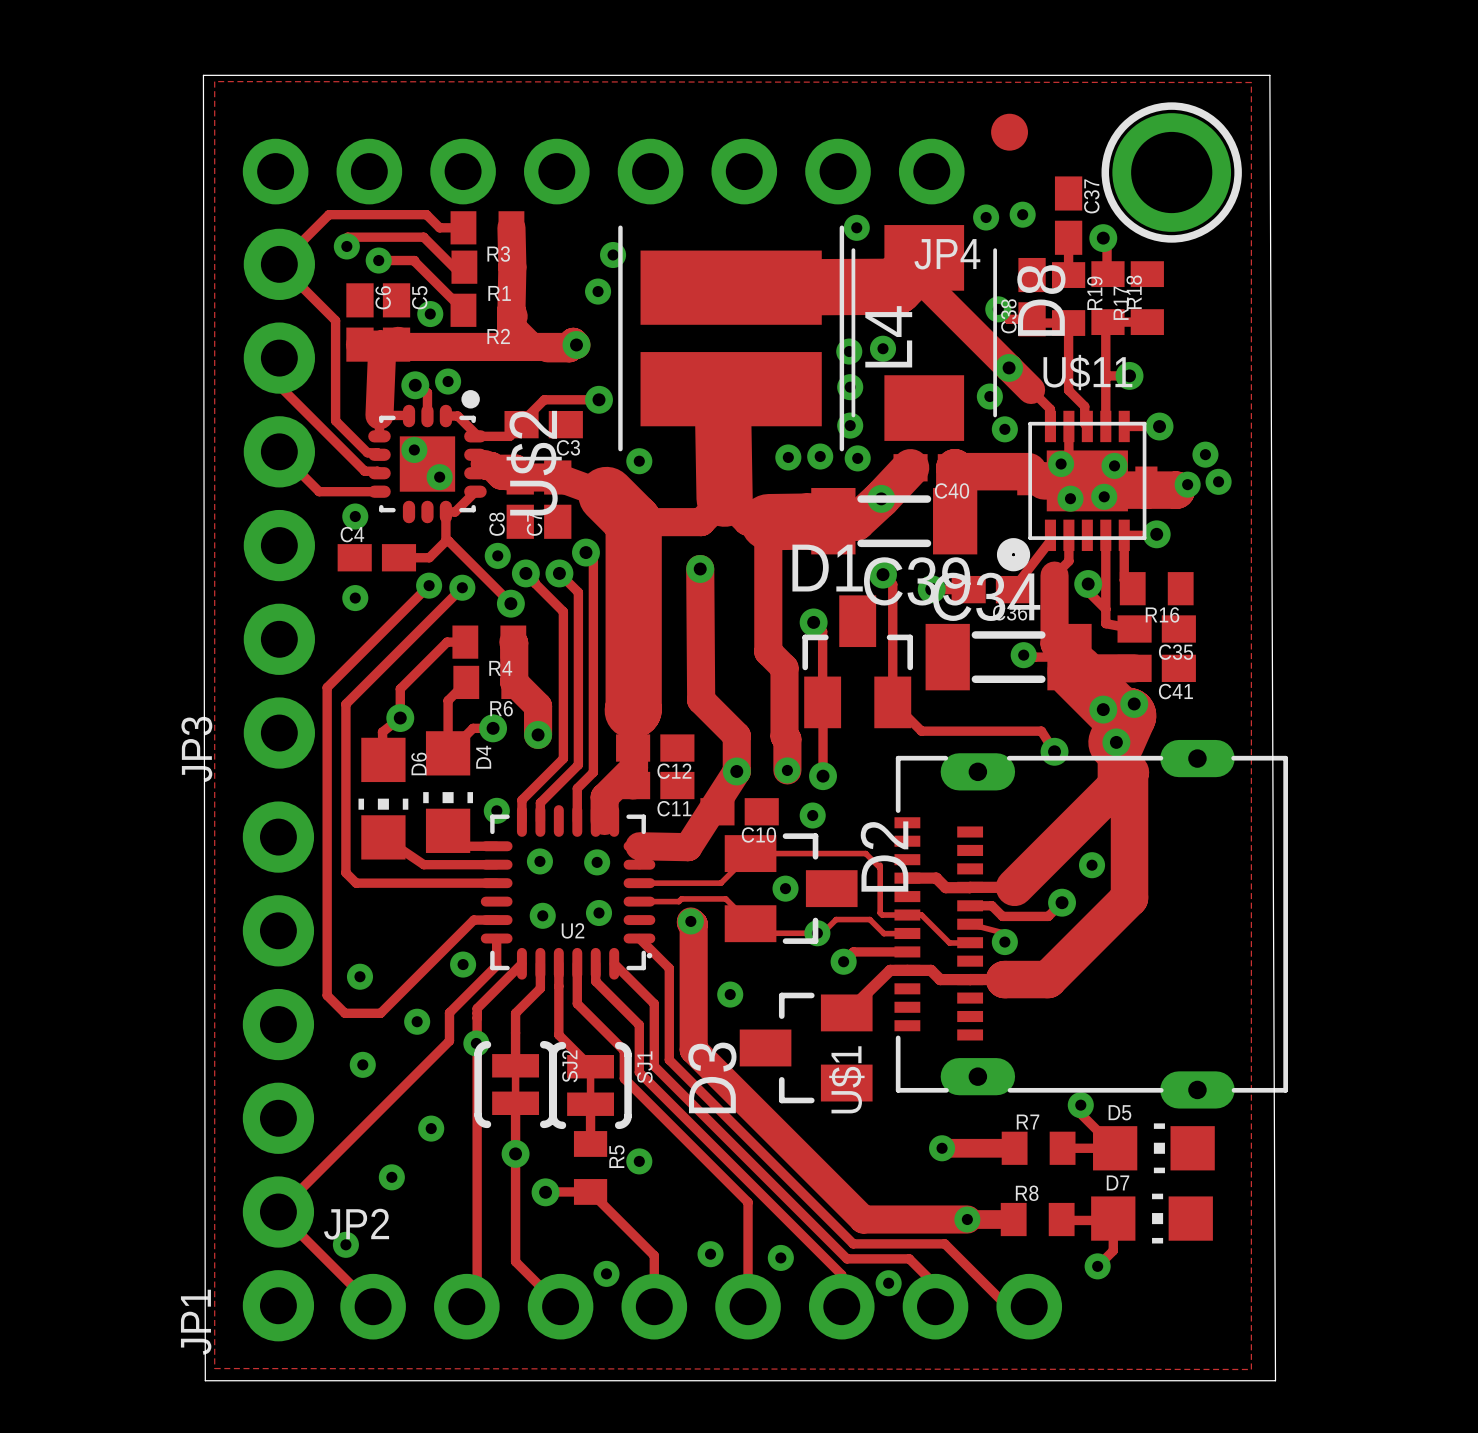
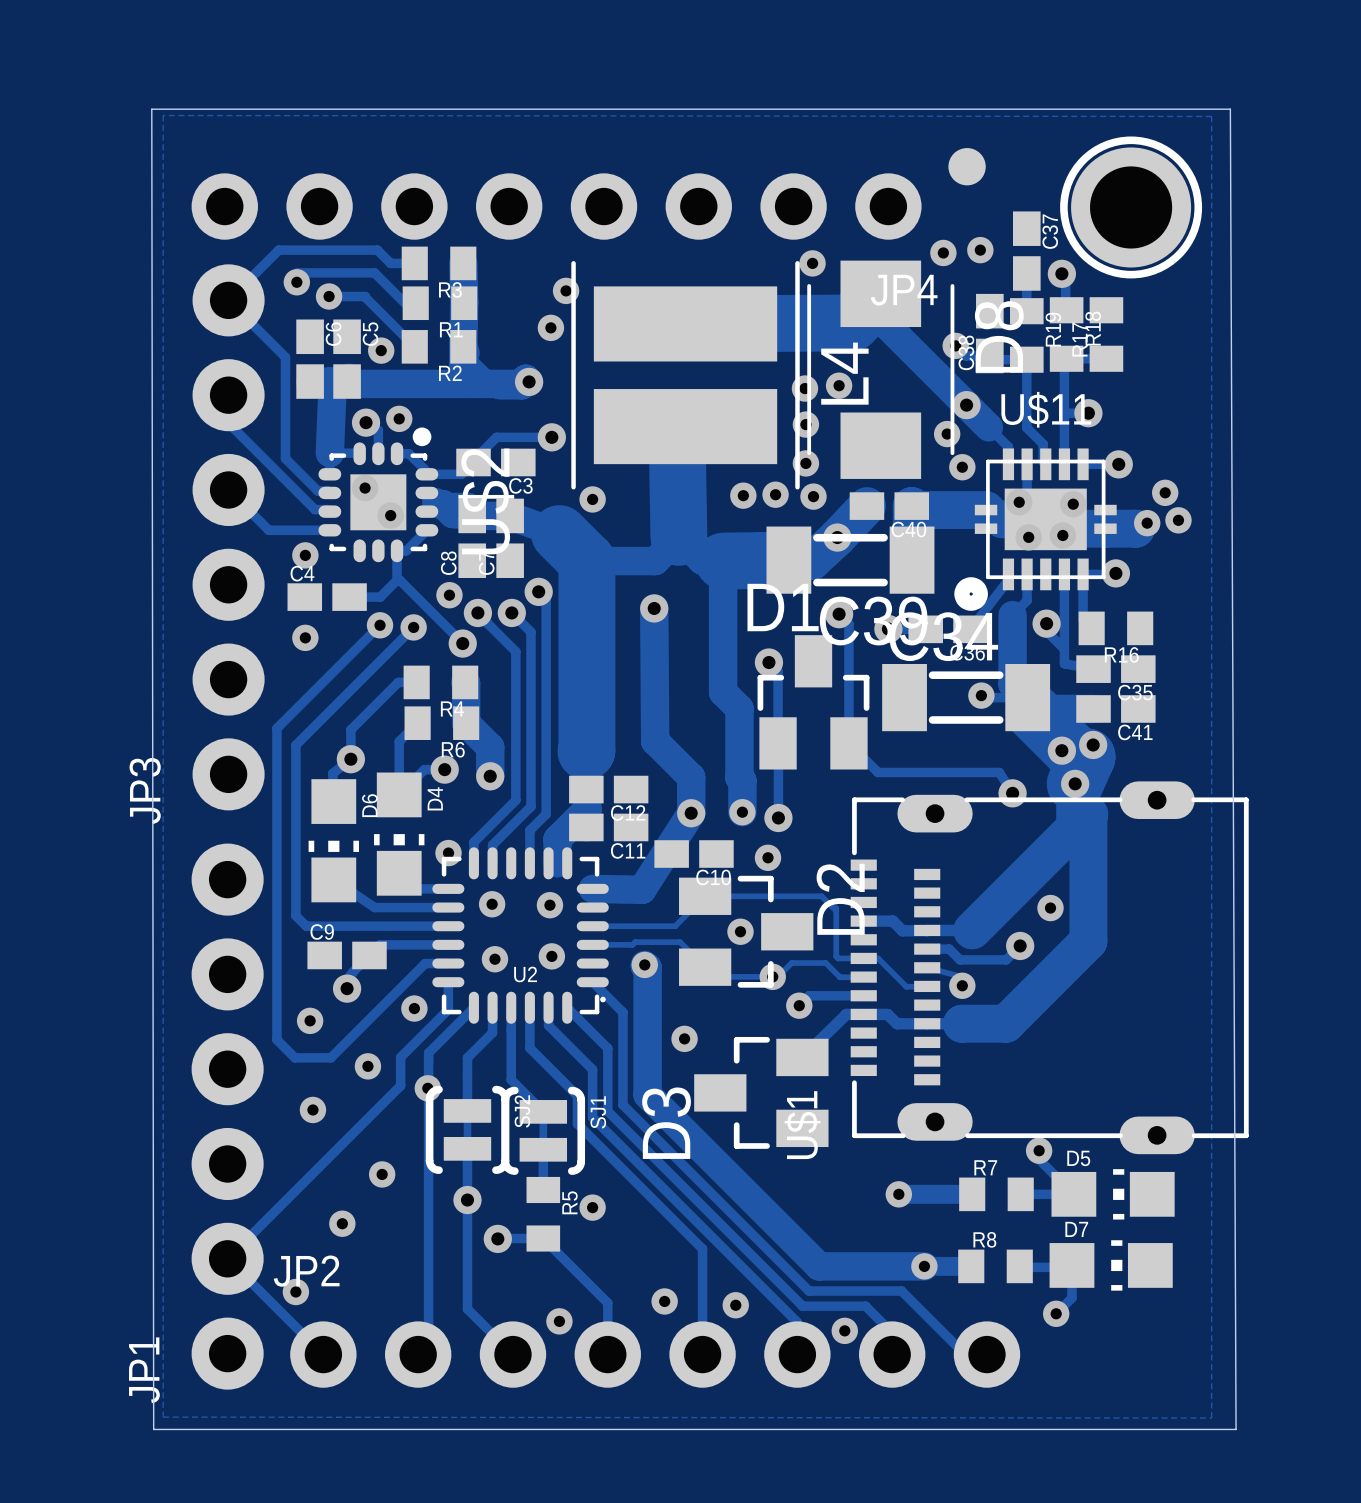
track: none -> (448, 944) (380, 944) (352, 972) (347, 988)
C9: none -> (347, 955)
via: none -> (347, 988)

